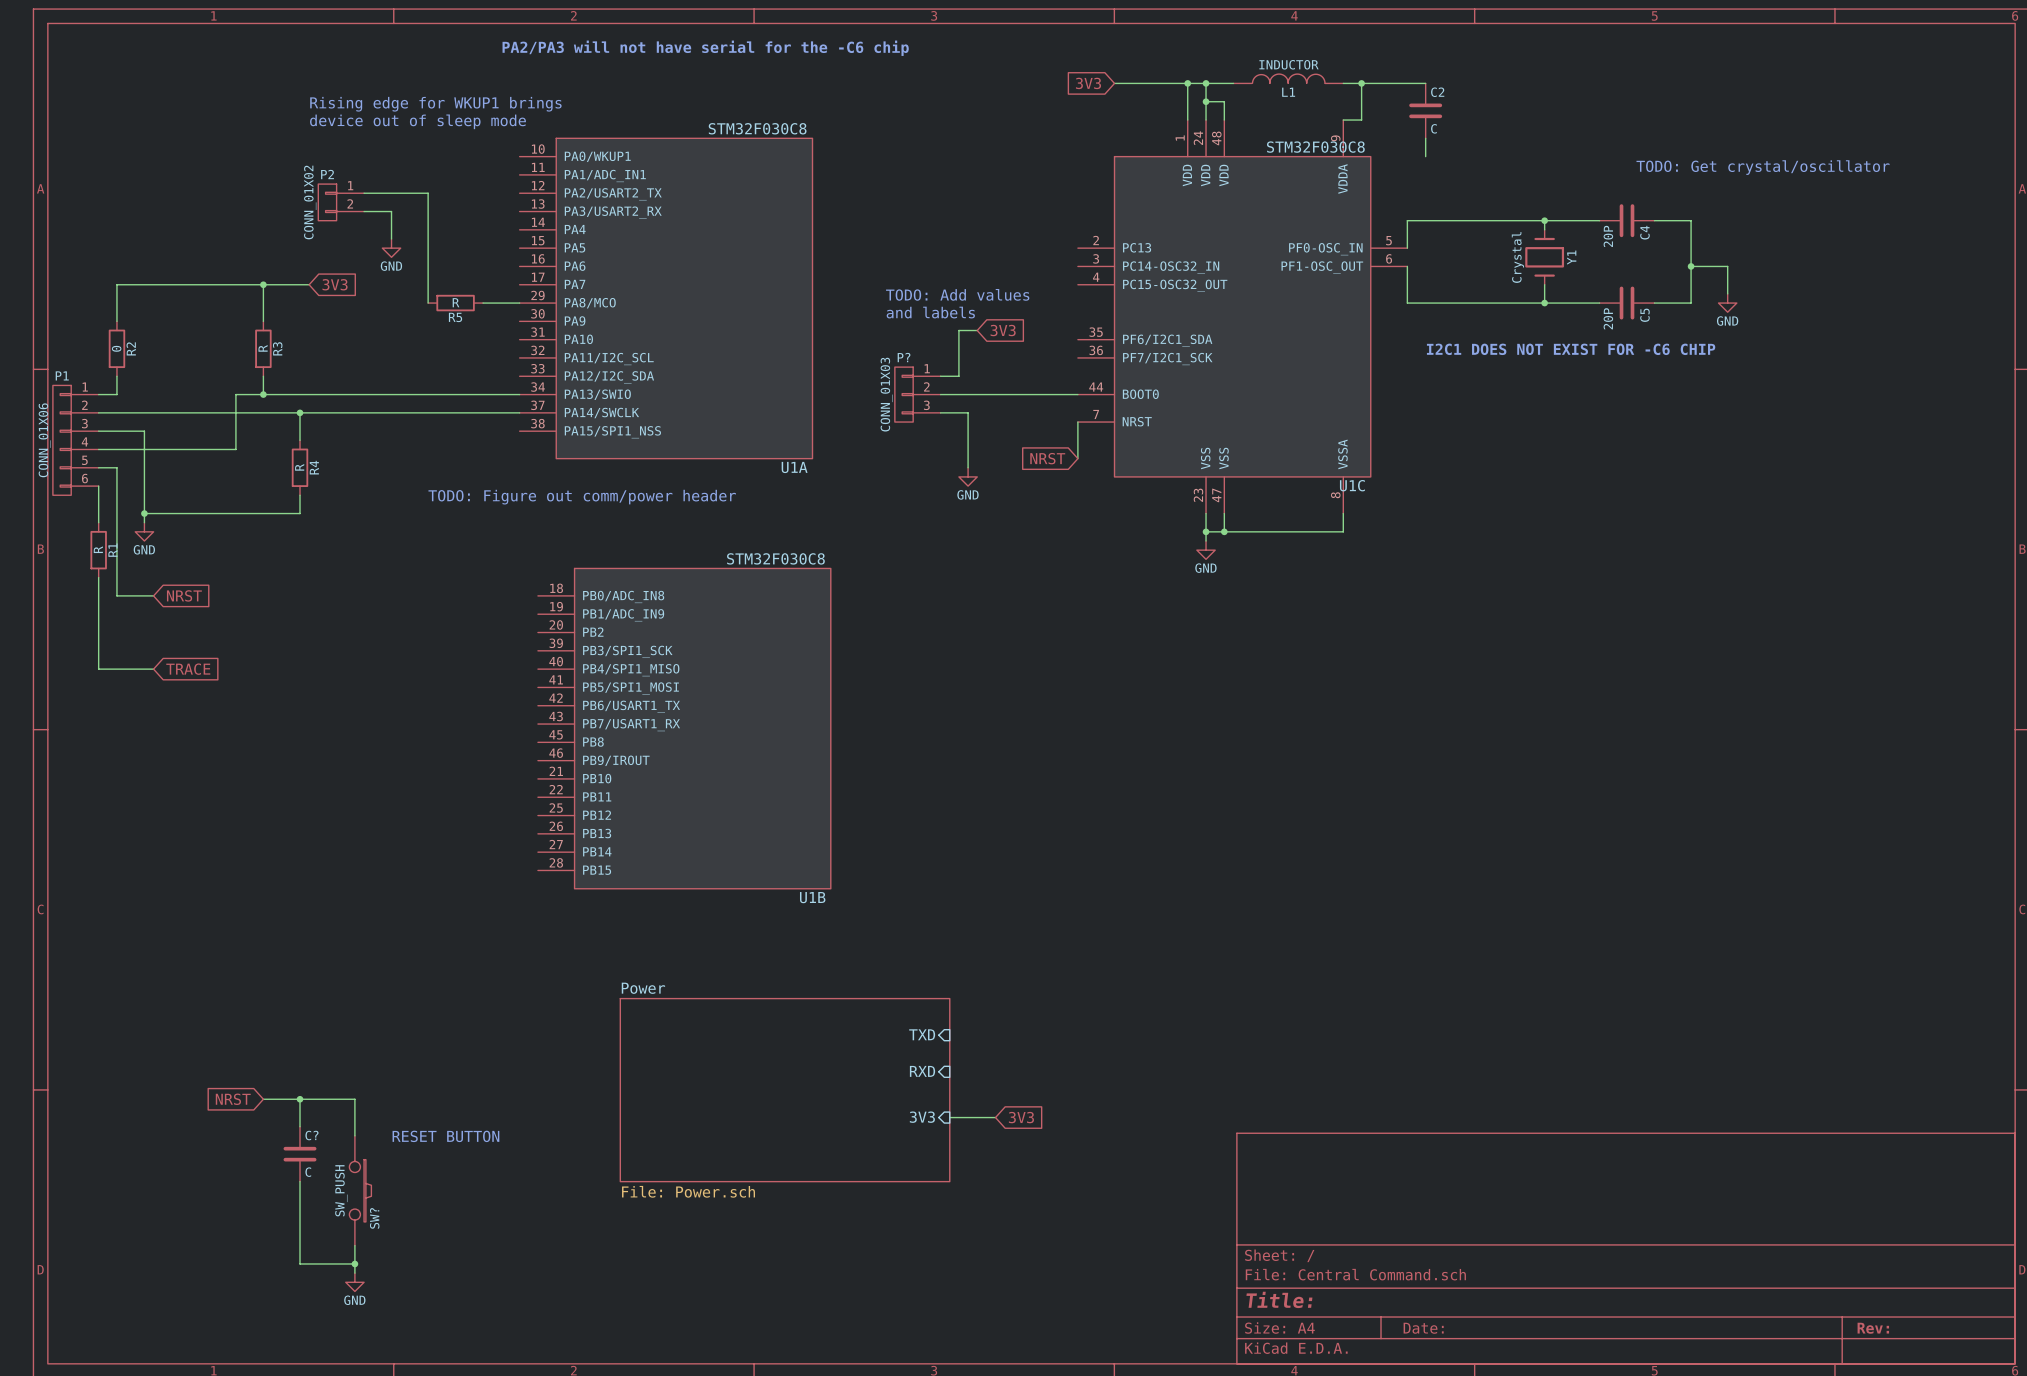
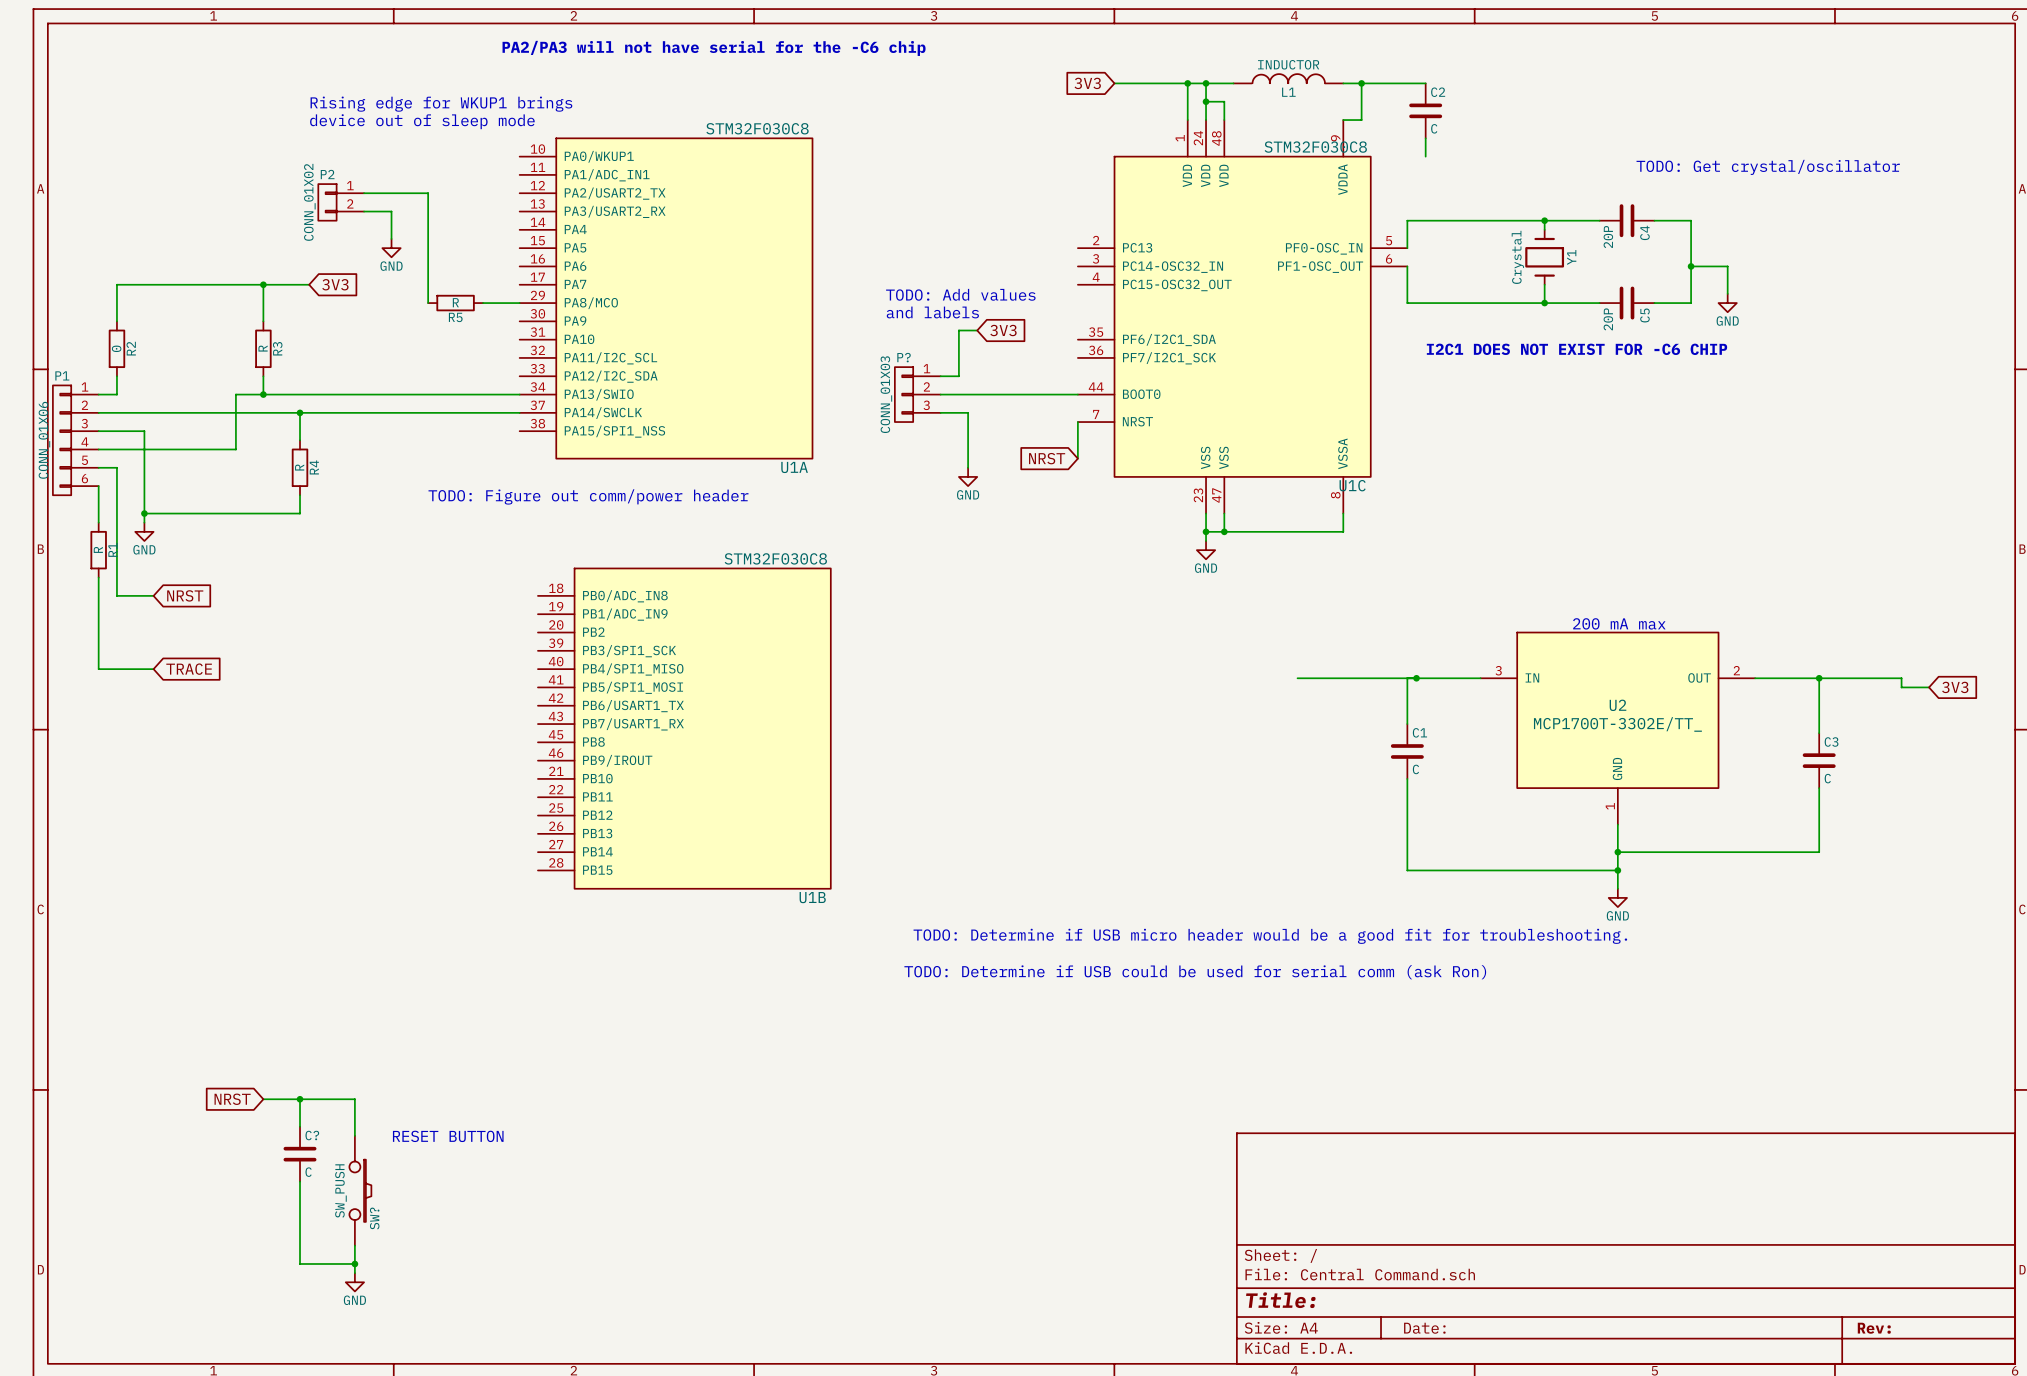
text: none -> 200 mA max (1619, 623)
wire: none -> (1297, 678) (1480, 678)
wire: none -> (1407, 678) (1407, 724)
junction: none -> (1416, 678)
wire: none -> (1755, 678) (1901, 678) (1901, 687) (1929, 687)
wire: none -> (1819, 678) (1819, 733)
junction: none -> (1819, 678)
global label: none -> 3V3 (1955, 687)
U2: none -> MCP1700T-3302E/TT_ (1617, 728)
C1: none -> C (1407, 751)
C3: none -> C (1819, 760)
wire: none -> (1407, 778) (1407, 870) (1617, 870)
wire: none -> (1819, 788) (1819, 852) (1617, 852)
wire: none -> (1617, 824) (1617, 888)
junction: none -> (1617, 852)
junction: none -> (1617, 870)
power symbol: none -> GND (1617, 897)
text: none -> TODO: Determine if USB micro header would be a good fit for troubleshooting. (1270, 936)
text: none -> TODO: Determine if USB could be used for serial comm (ask Ron) (1195, 972)
sheet pin: TXD (922, 1034) -> none
sheet pin: RXD (922, 1071) -> none
sheet Power: File: Power.sch (785, 1090) -> none
sheet pin: 3V3 (922, 1117) -> none
wire: (949, 1117) (995, 1117) -> none
global label: 3V3 (1021, 1117) -> none

